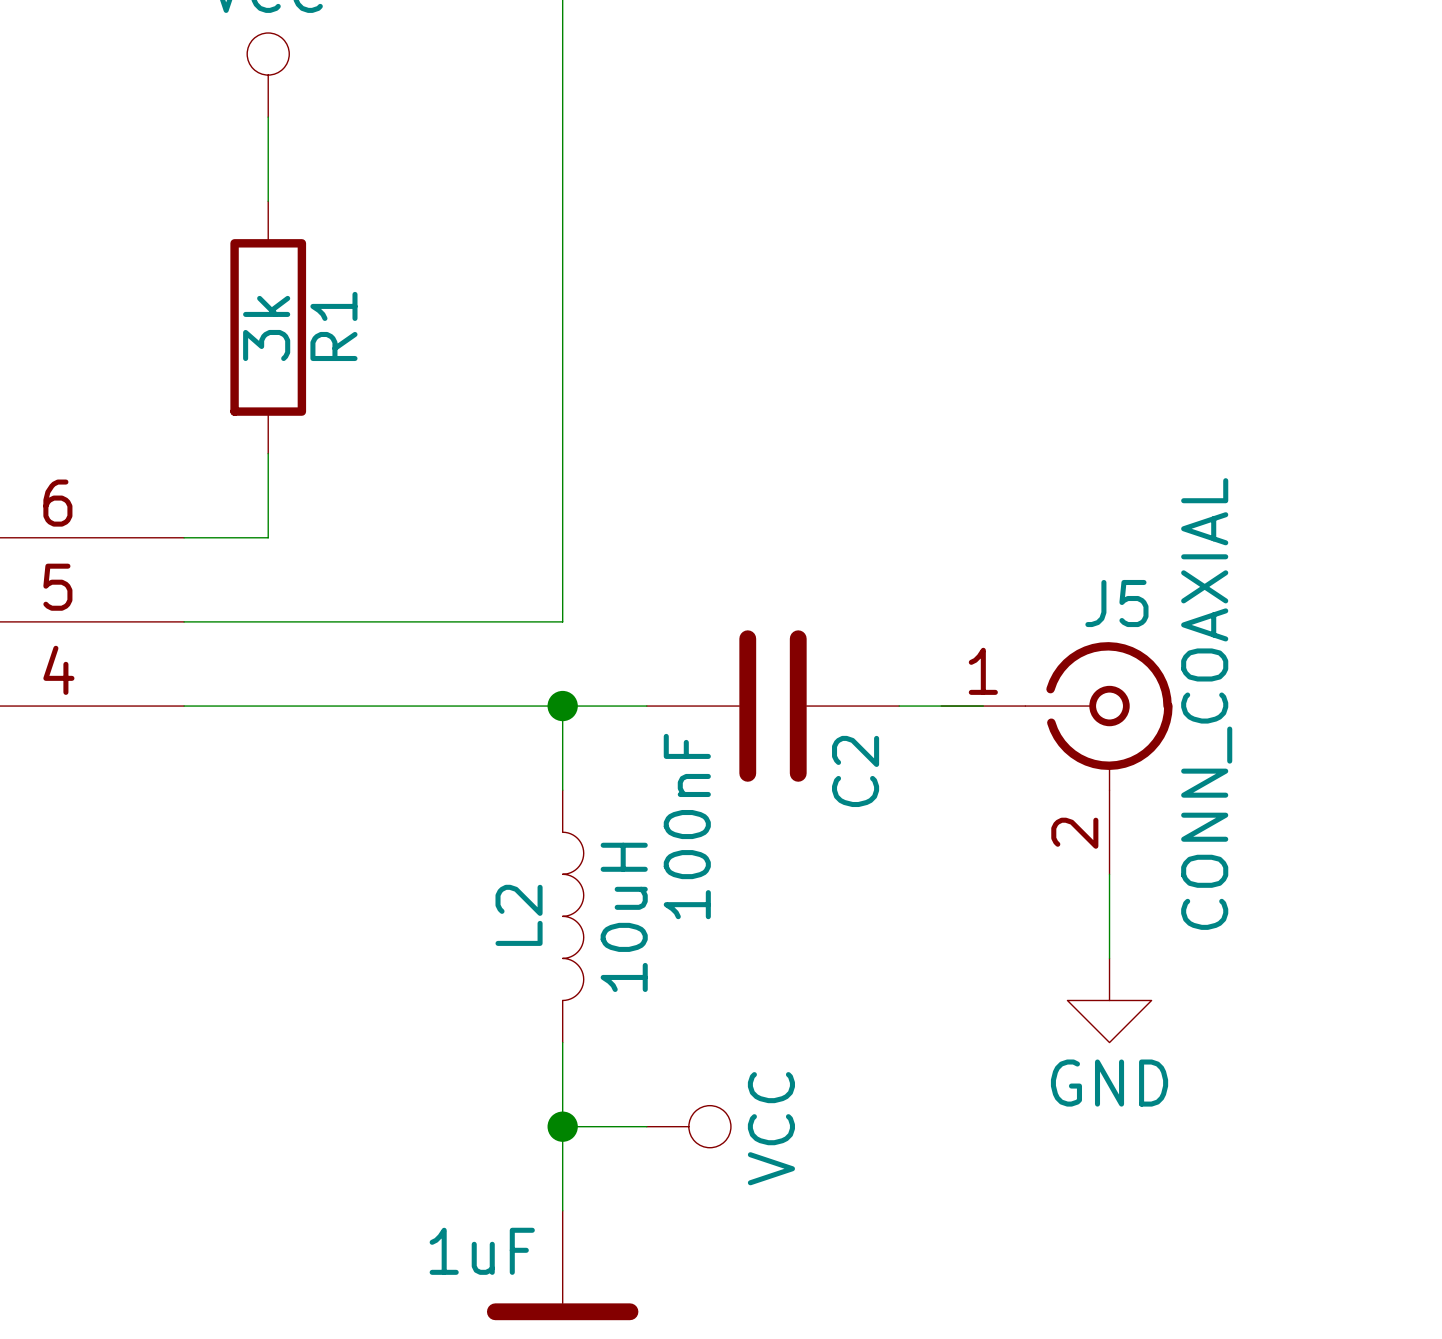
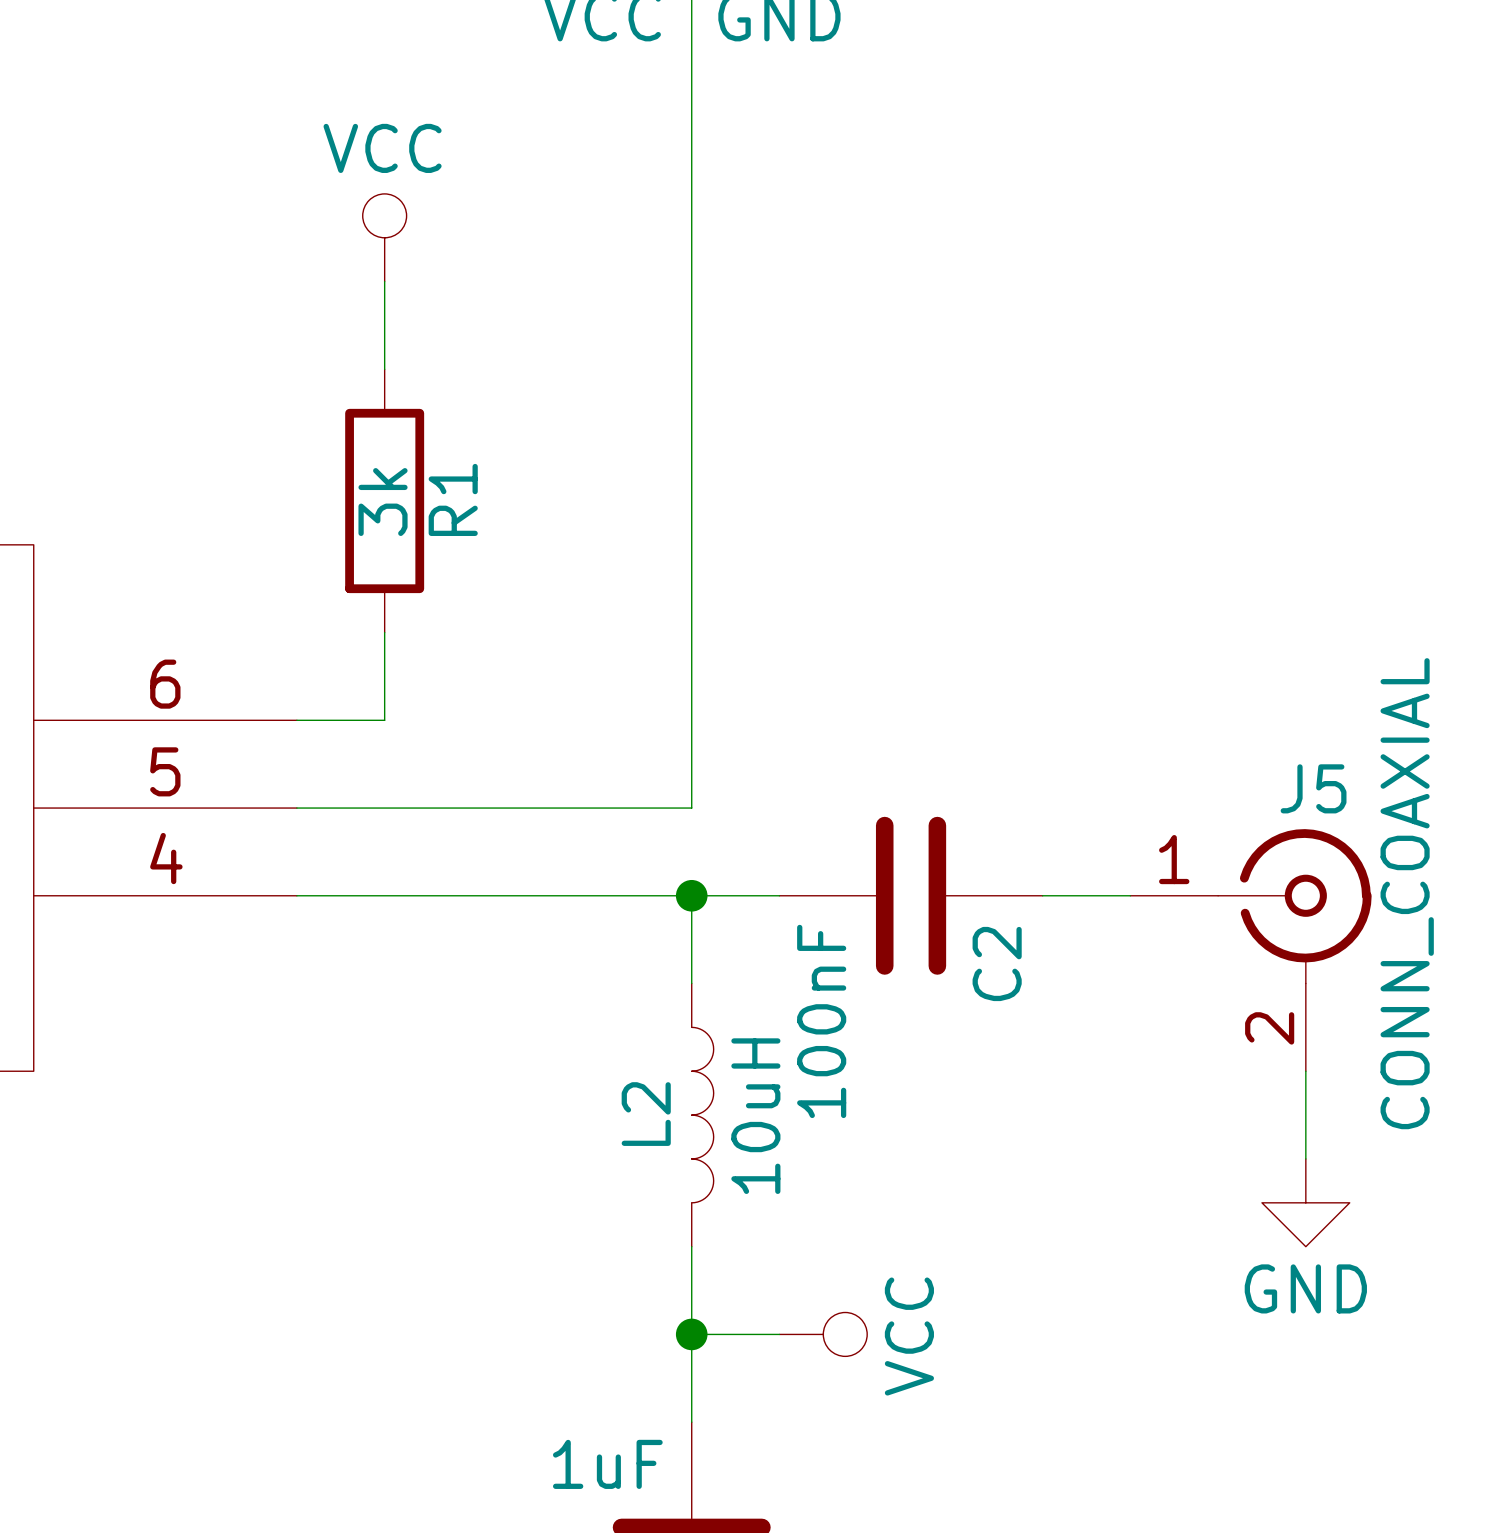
J5 position: (1056, 758) -> (1251, 950)
wire: (1109, 874) (1109, 958) -> (1305, 1071) (1305, 1158)
power symbol position: GND (1109, 1000) -> GND (1305, 1202)

